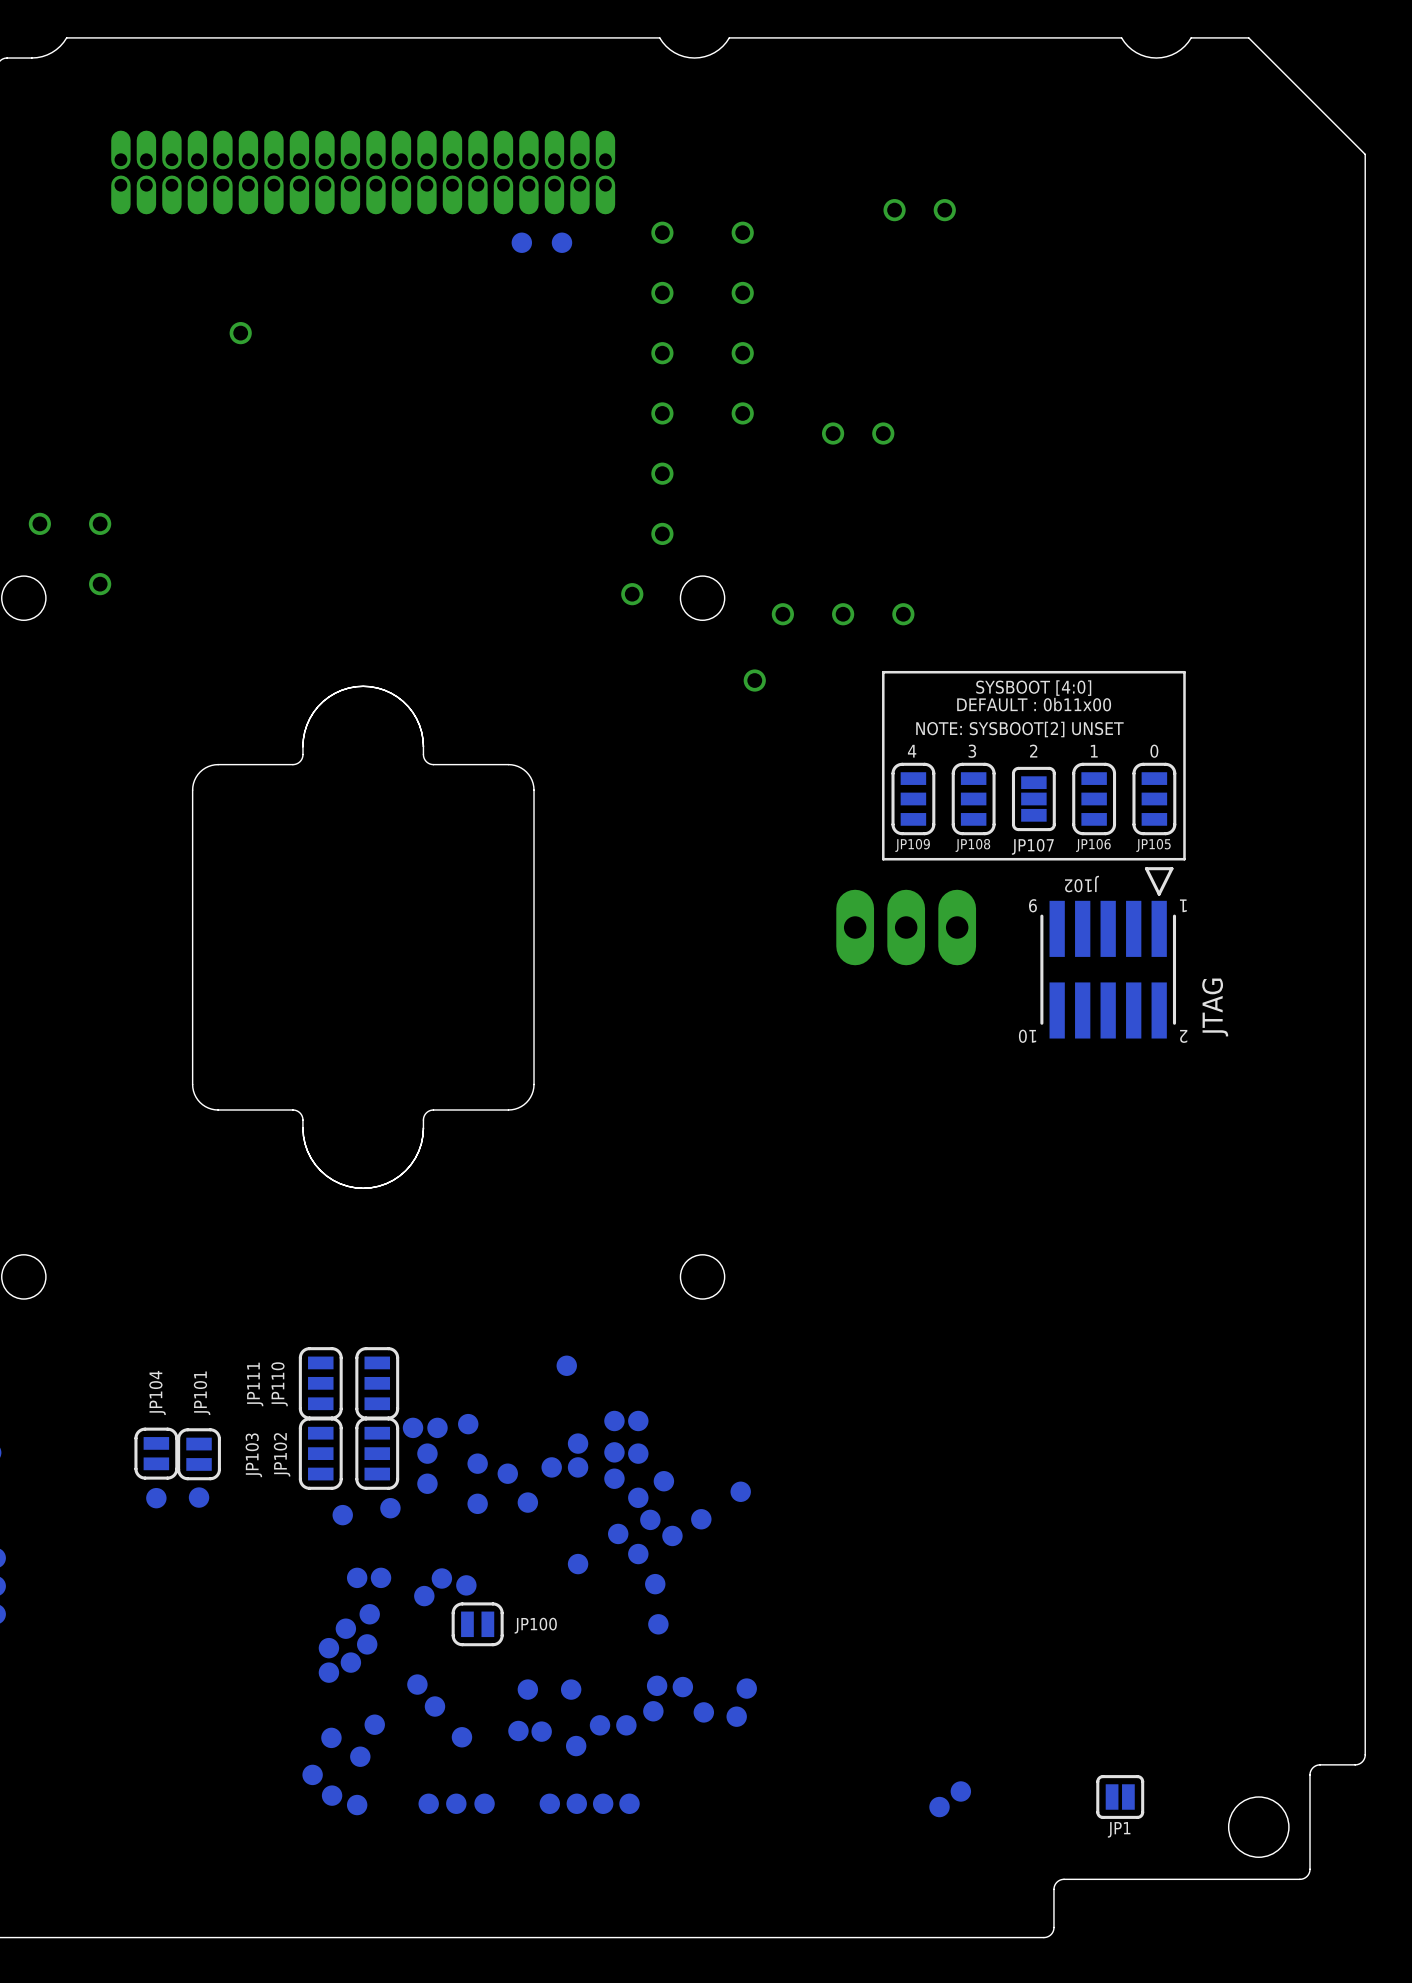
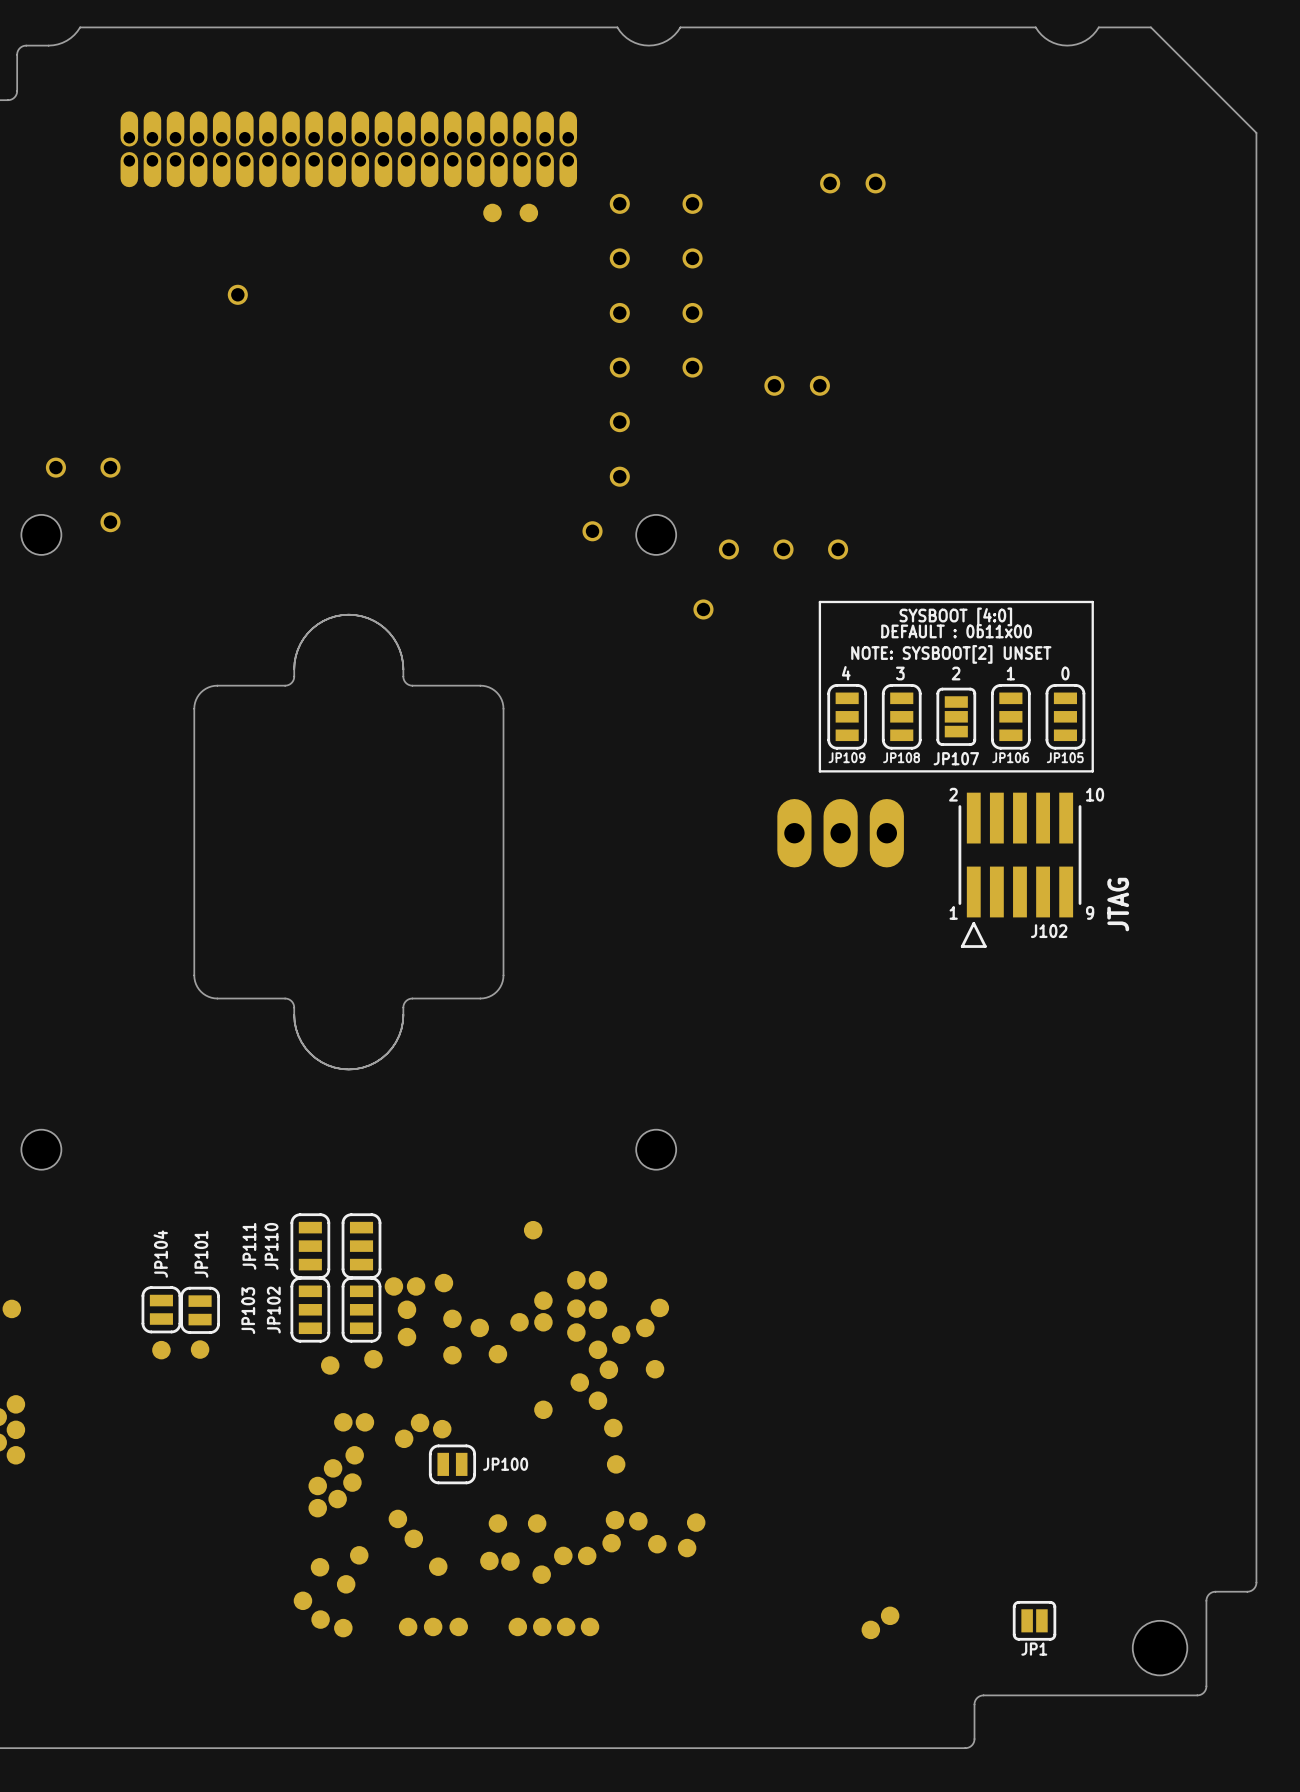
J102 rotation: 0° (1108, 952) -> 180° (1019, 870)
part: none -> (659, 1307)
part: none -> (645, 1327)
part: (740, 1491) -> none
part: (672, 1535) -> none

